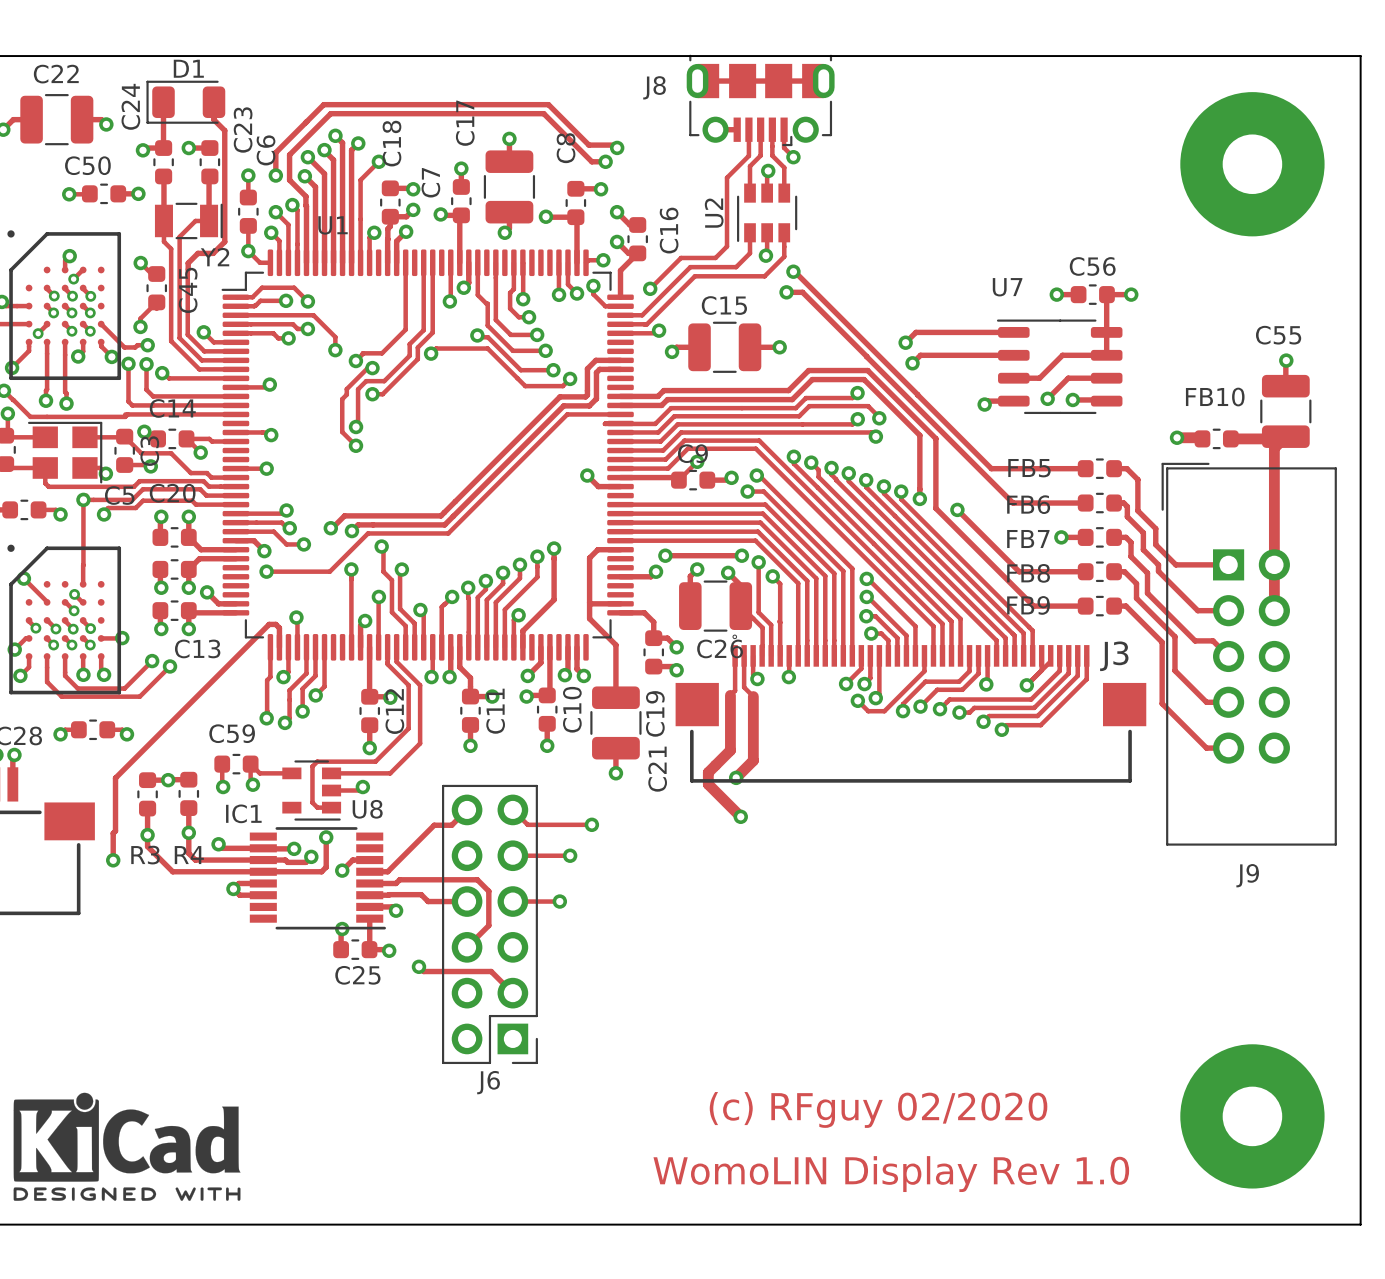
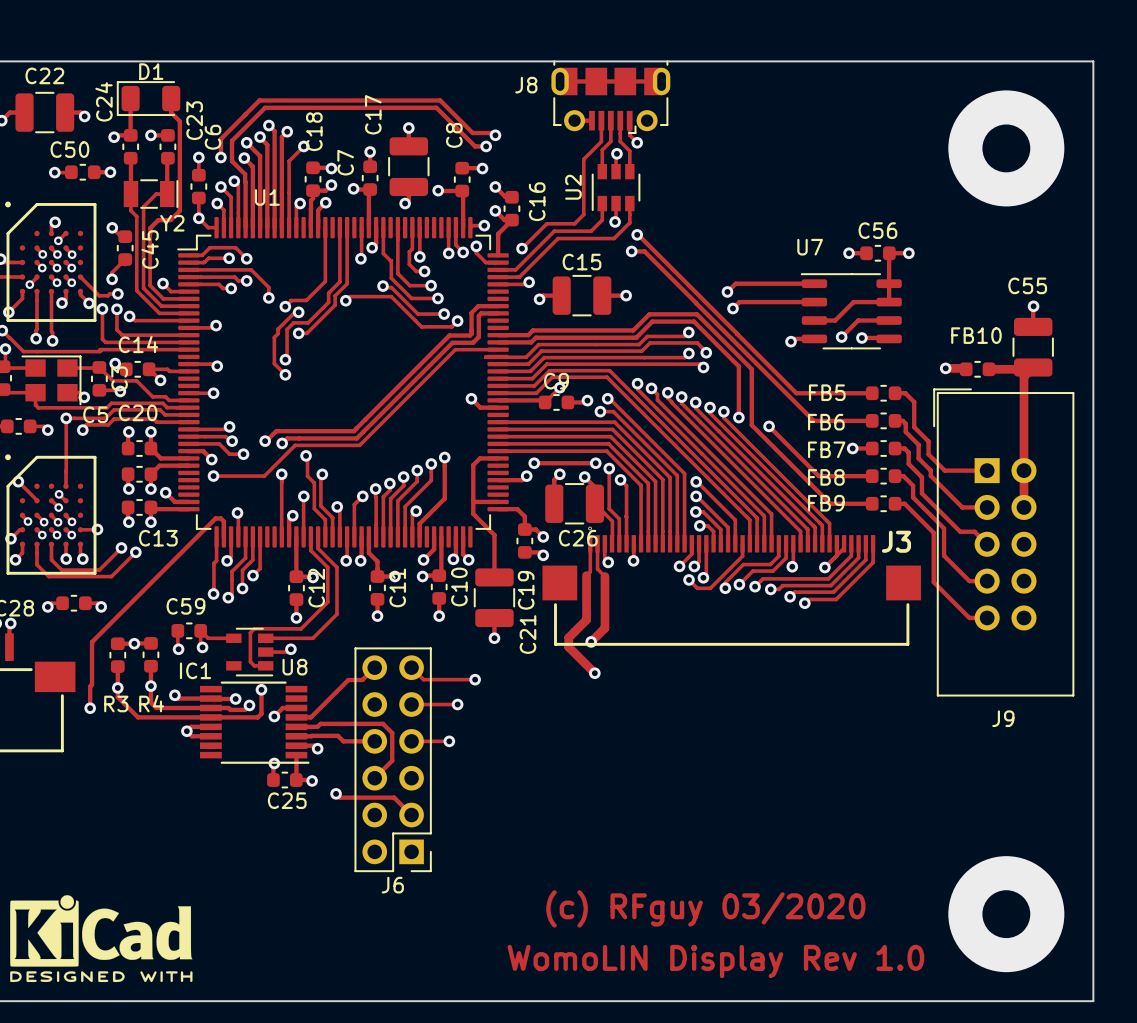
text: (c) RFguy 02/2020 (878, 1109) -> (c) RFguy 03/2020 (705, 908)

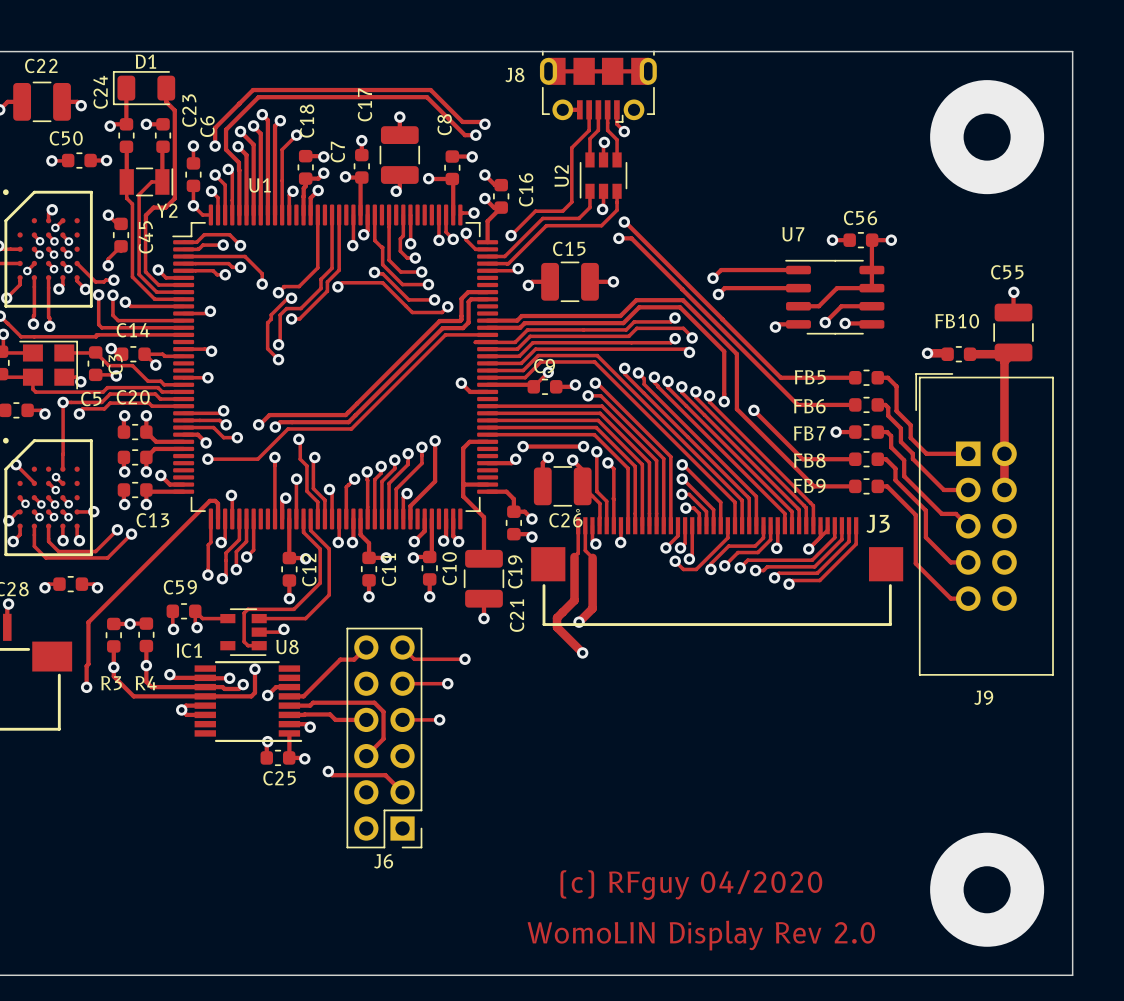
drawing: [10, 895, 193, 983] -> none
text: (c) RFguy 03/2020 (705, 908) -> (c) RFguy 04/2020 (691, 885)
text: WomoLIN Display Rev 1.0 (715, 961) -> WomoLIN Display Rev 2.0 (701, 935)

